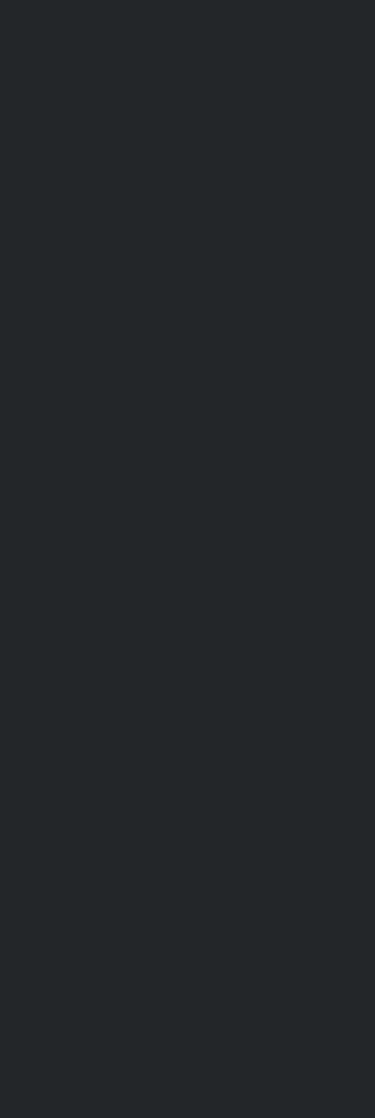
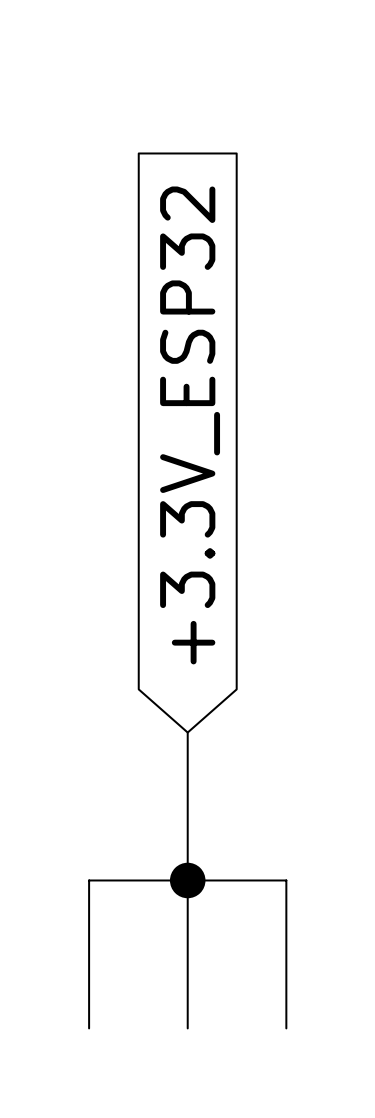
global label: none -> +3.3V_ESP32 (190, 425)
wire: none -> (187, 732) (187, 1028)
junction: none -> (187, 880)
wire: none -> (89, 1028) (89, 880) (286, 880) (286, 1028)

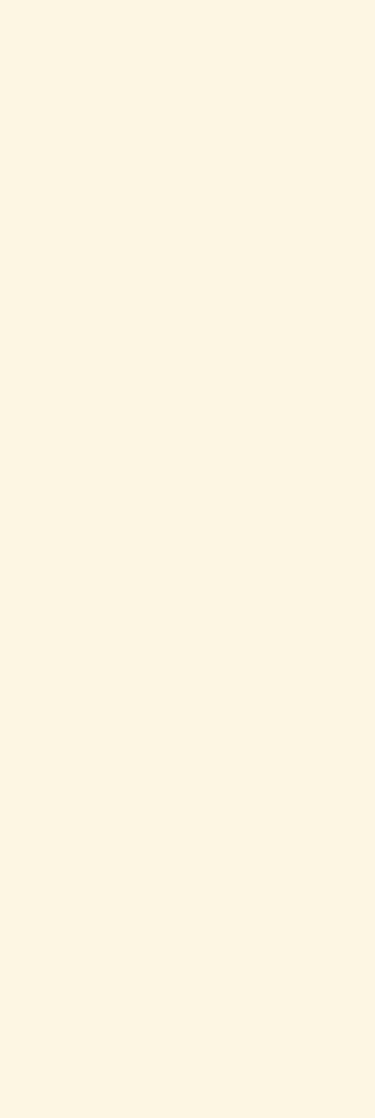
global label: +3.3V_ESP32 (190, 425) -> none
wire: (187, 732) (187, 1028) -> none
junction: (187, 880) -> none
wire: (89, 1028) (89, 880) (286, 880) (286, 1028) -> none

